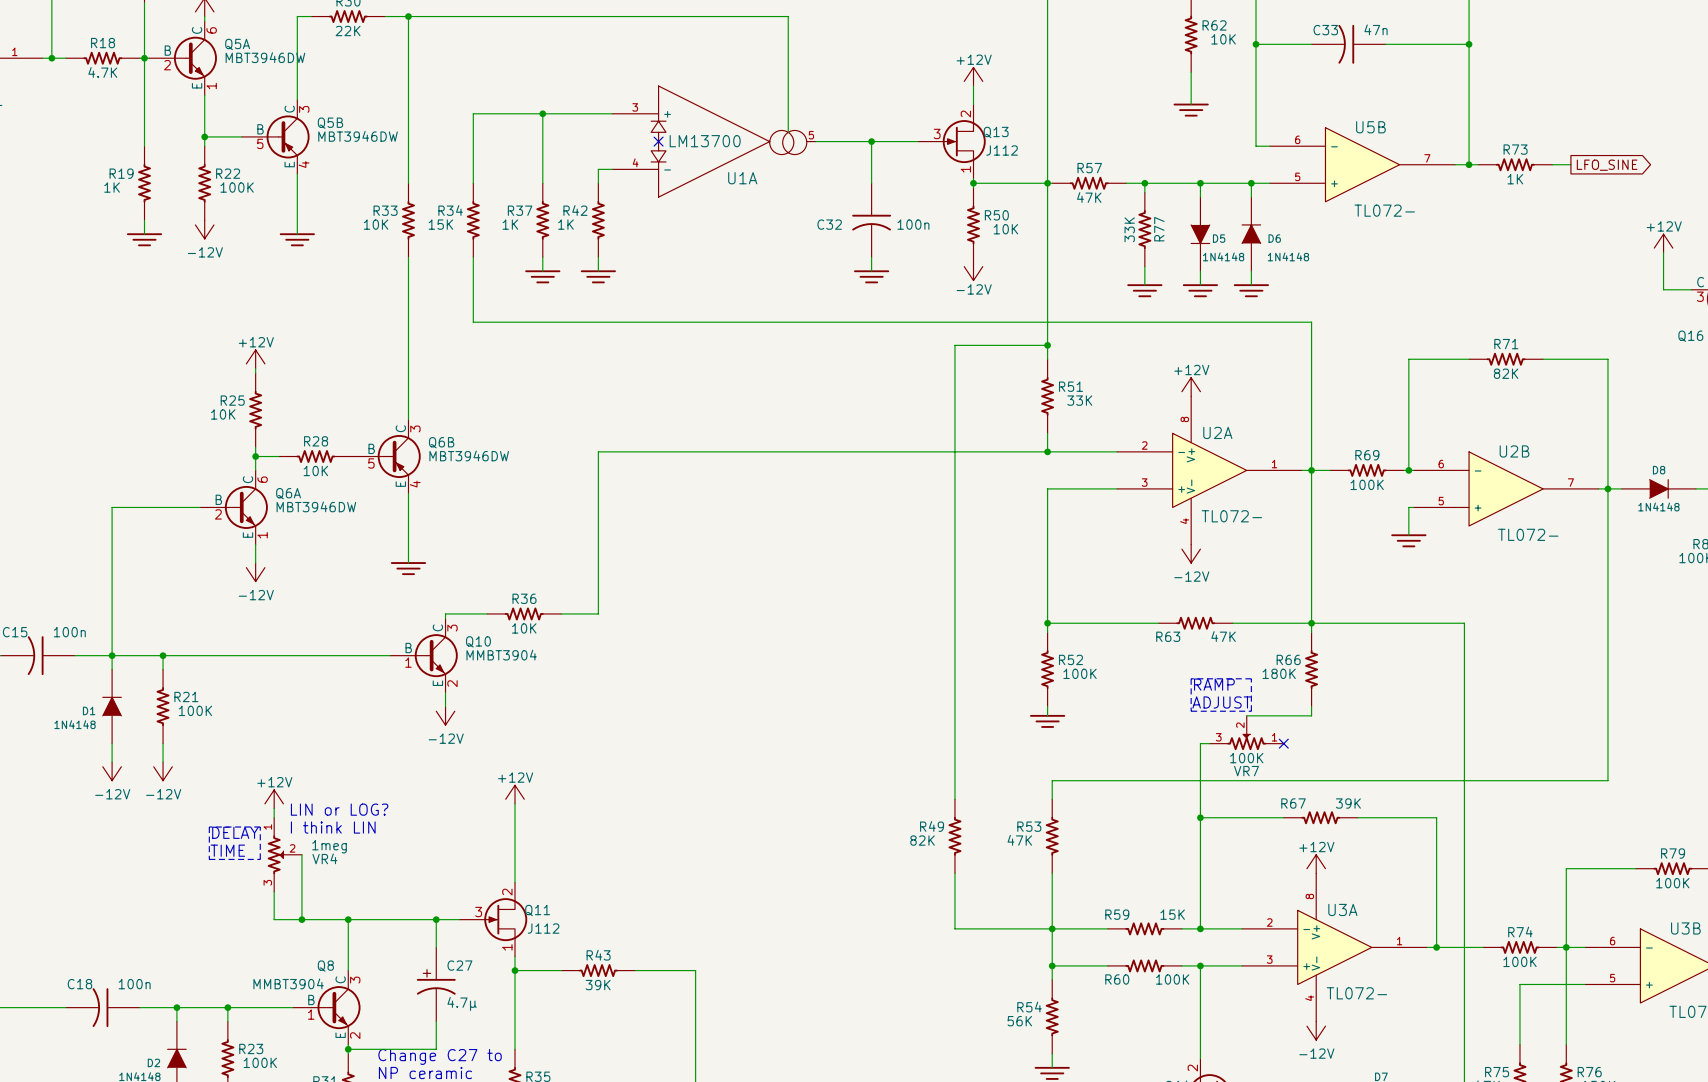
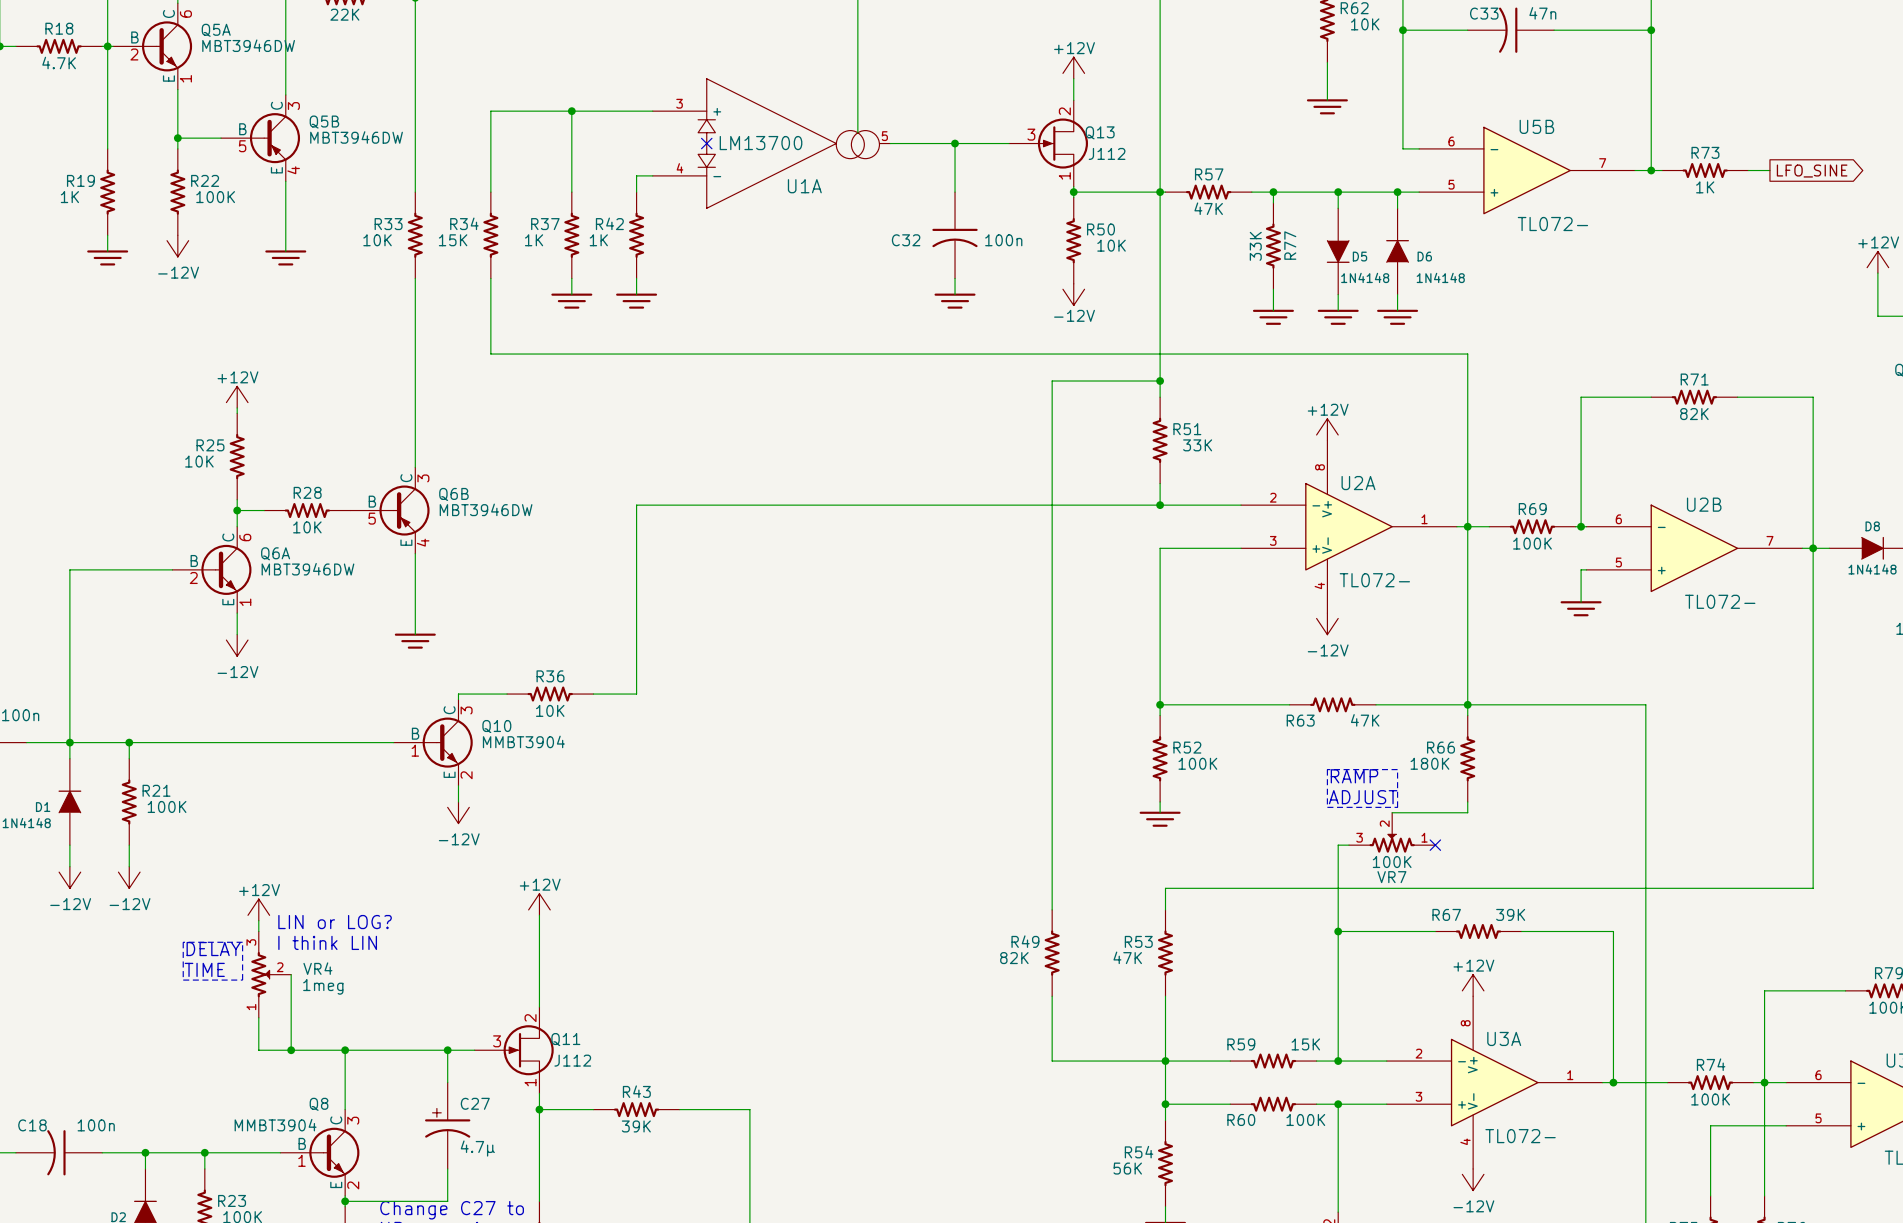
VR4 flip: as is (275, 854) -> up-down (260, 974)

